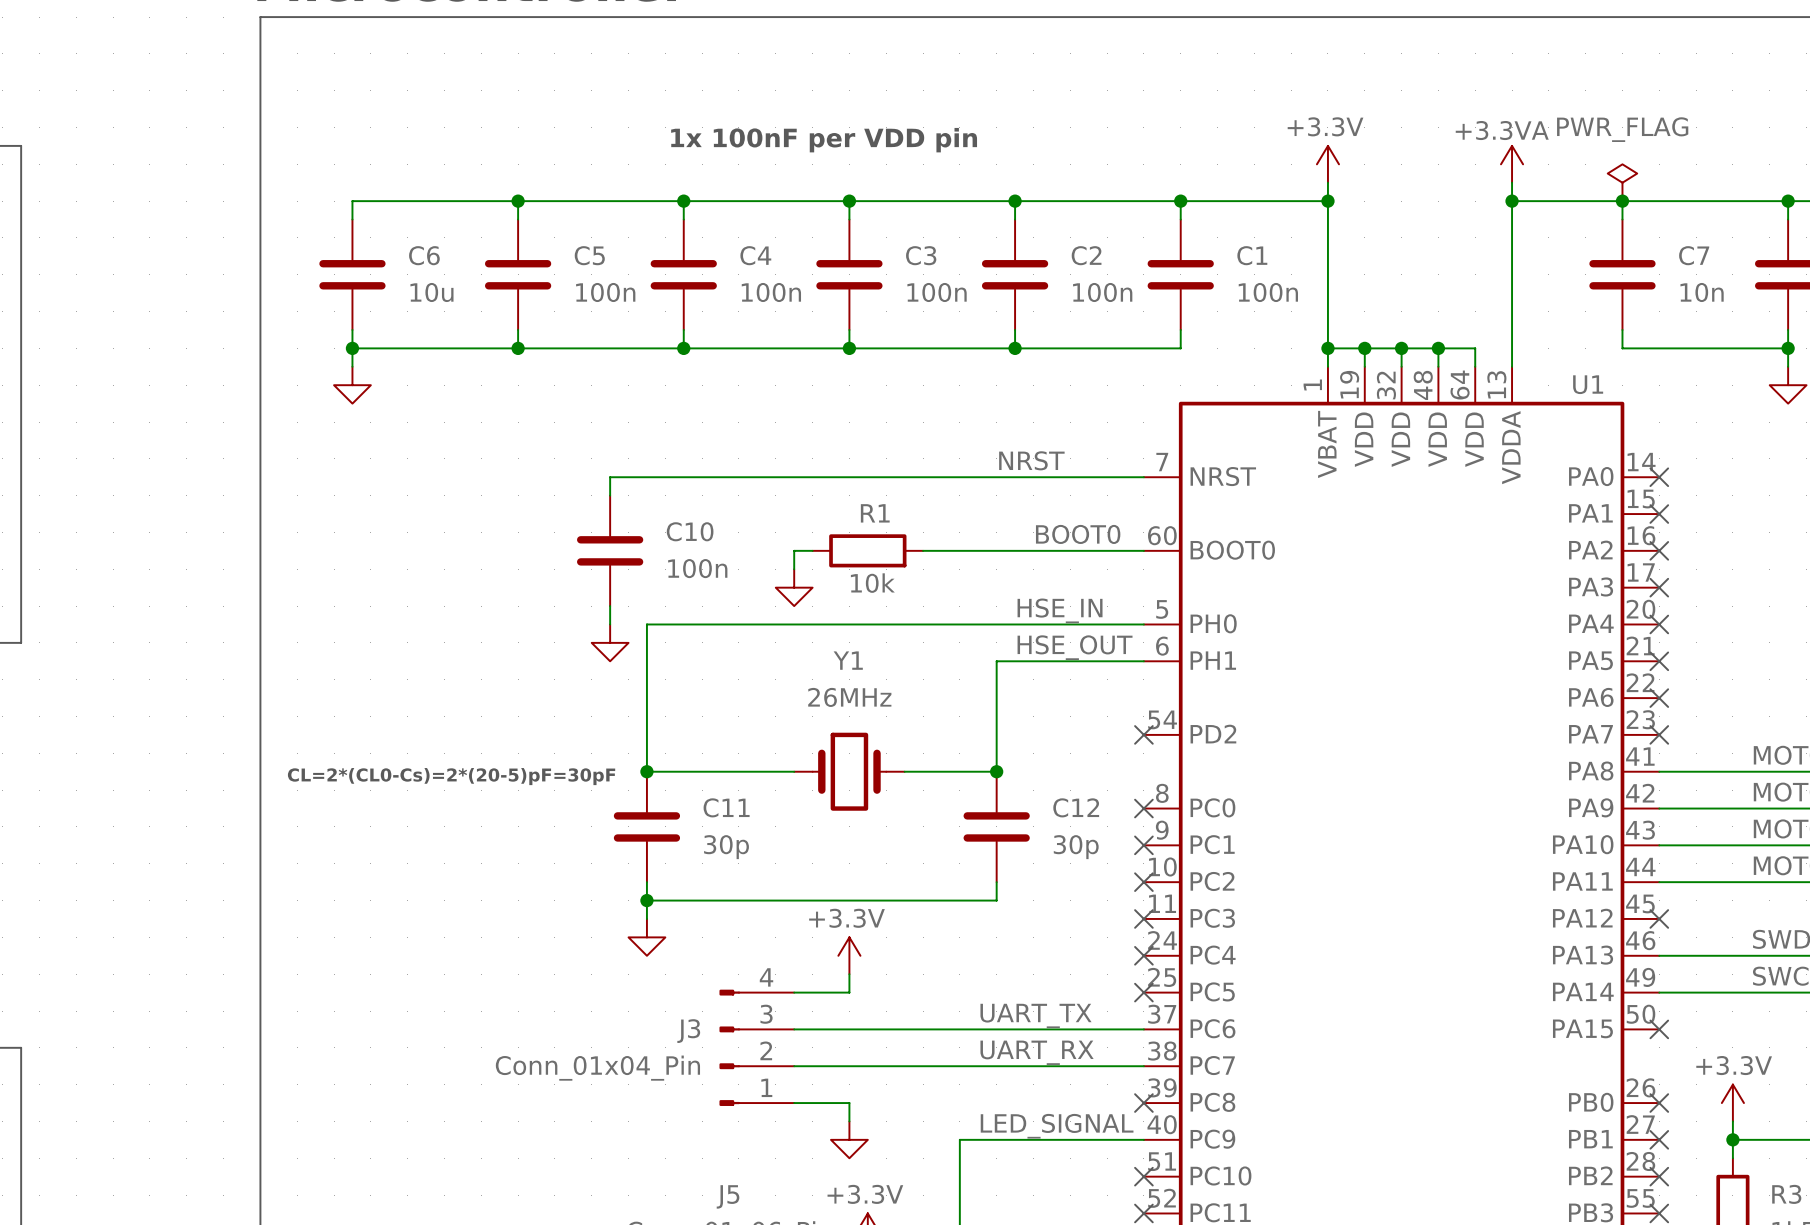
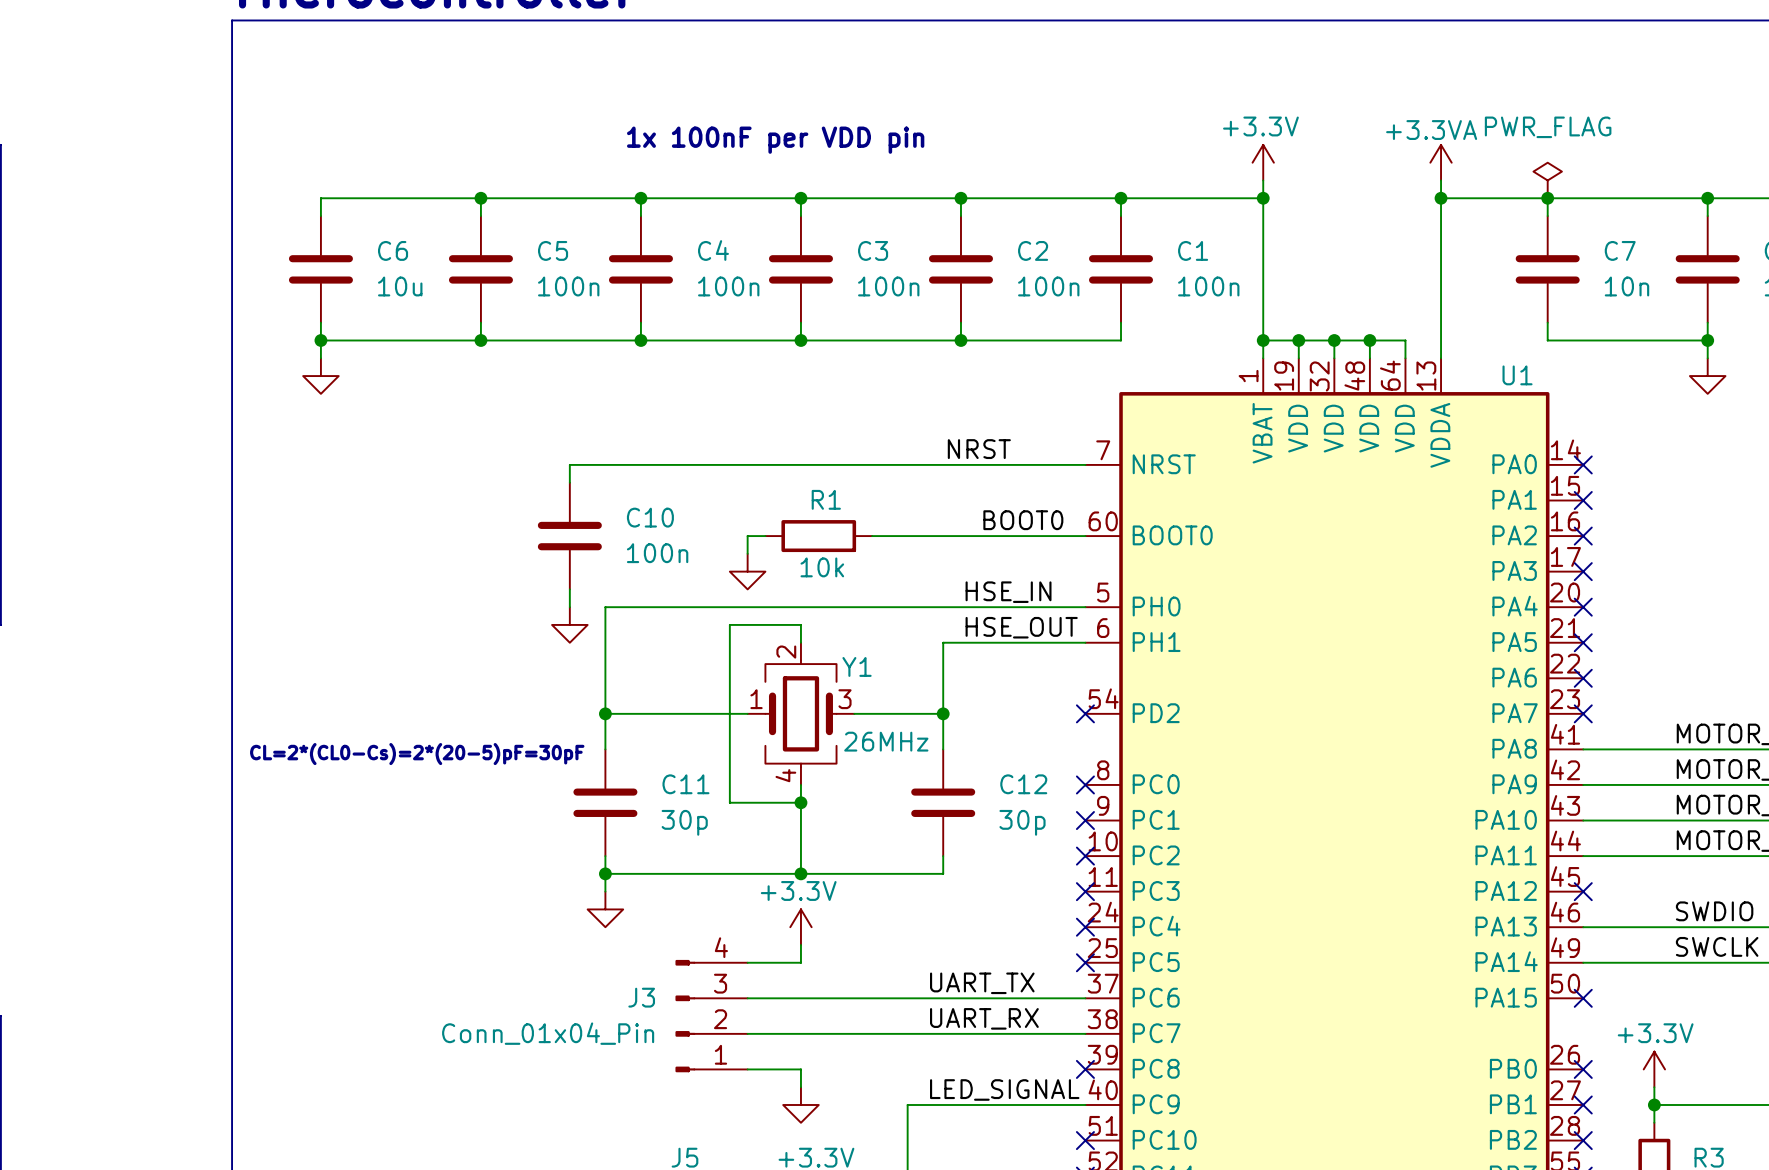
Y1 name position: Y1 (848, 660) -> Y1 (857, 666)
wire: none -> (800, 642) (800, 624) (729, 624) (729, 802) (800, 802)
Y1 value position: 26MHz (849, 697) -> 26MHz (886, 741)
Y1 symbol: [794, 732, 905, 811] -> [747, 642, 855, 785]
wire: (646, 771) (794, 771) -> (605, 713) (747, 713)
junction position: (646, 771) -> (605, 713)
wire: (904, 771) (996, 771) -> (854, 713) (943, 713)
junction position: (996, 771) -> (943, 713)
wire: none -> (800, 784) (800, 873)
junction: none -> (800, 802)
junction: none -> (800, 873)

